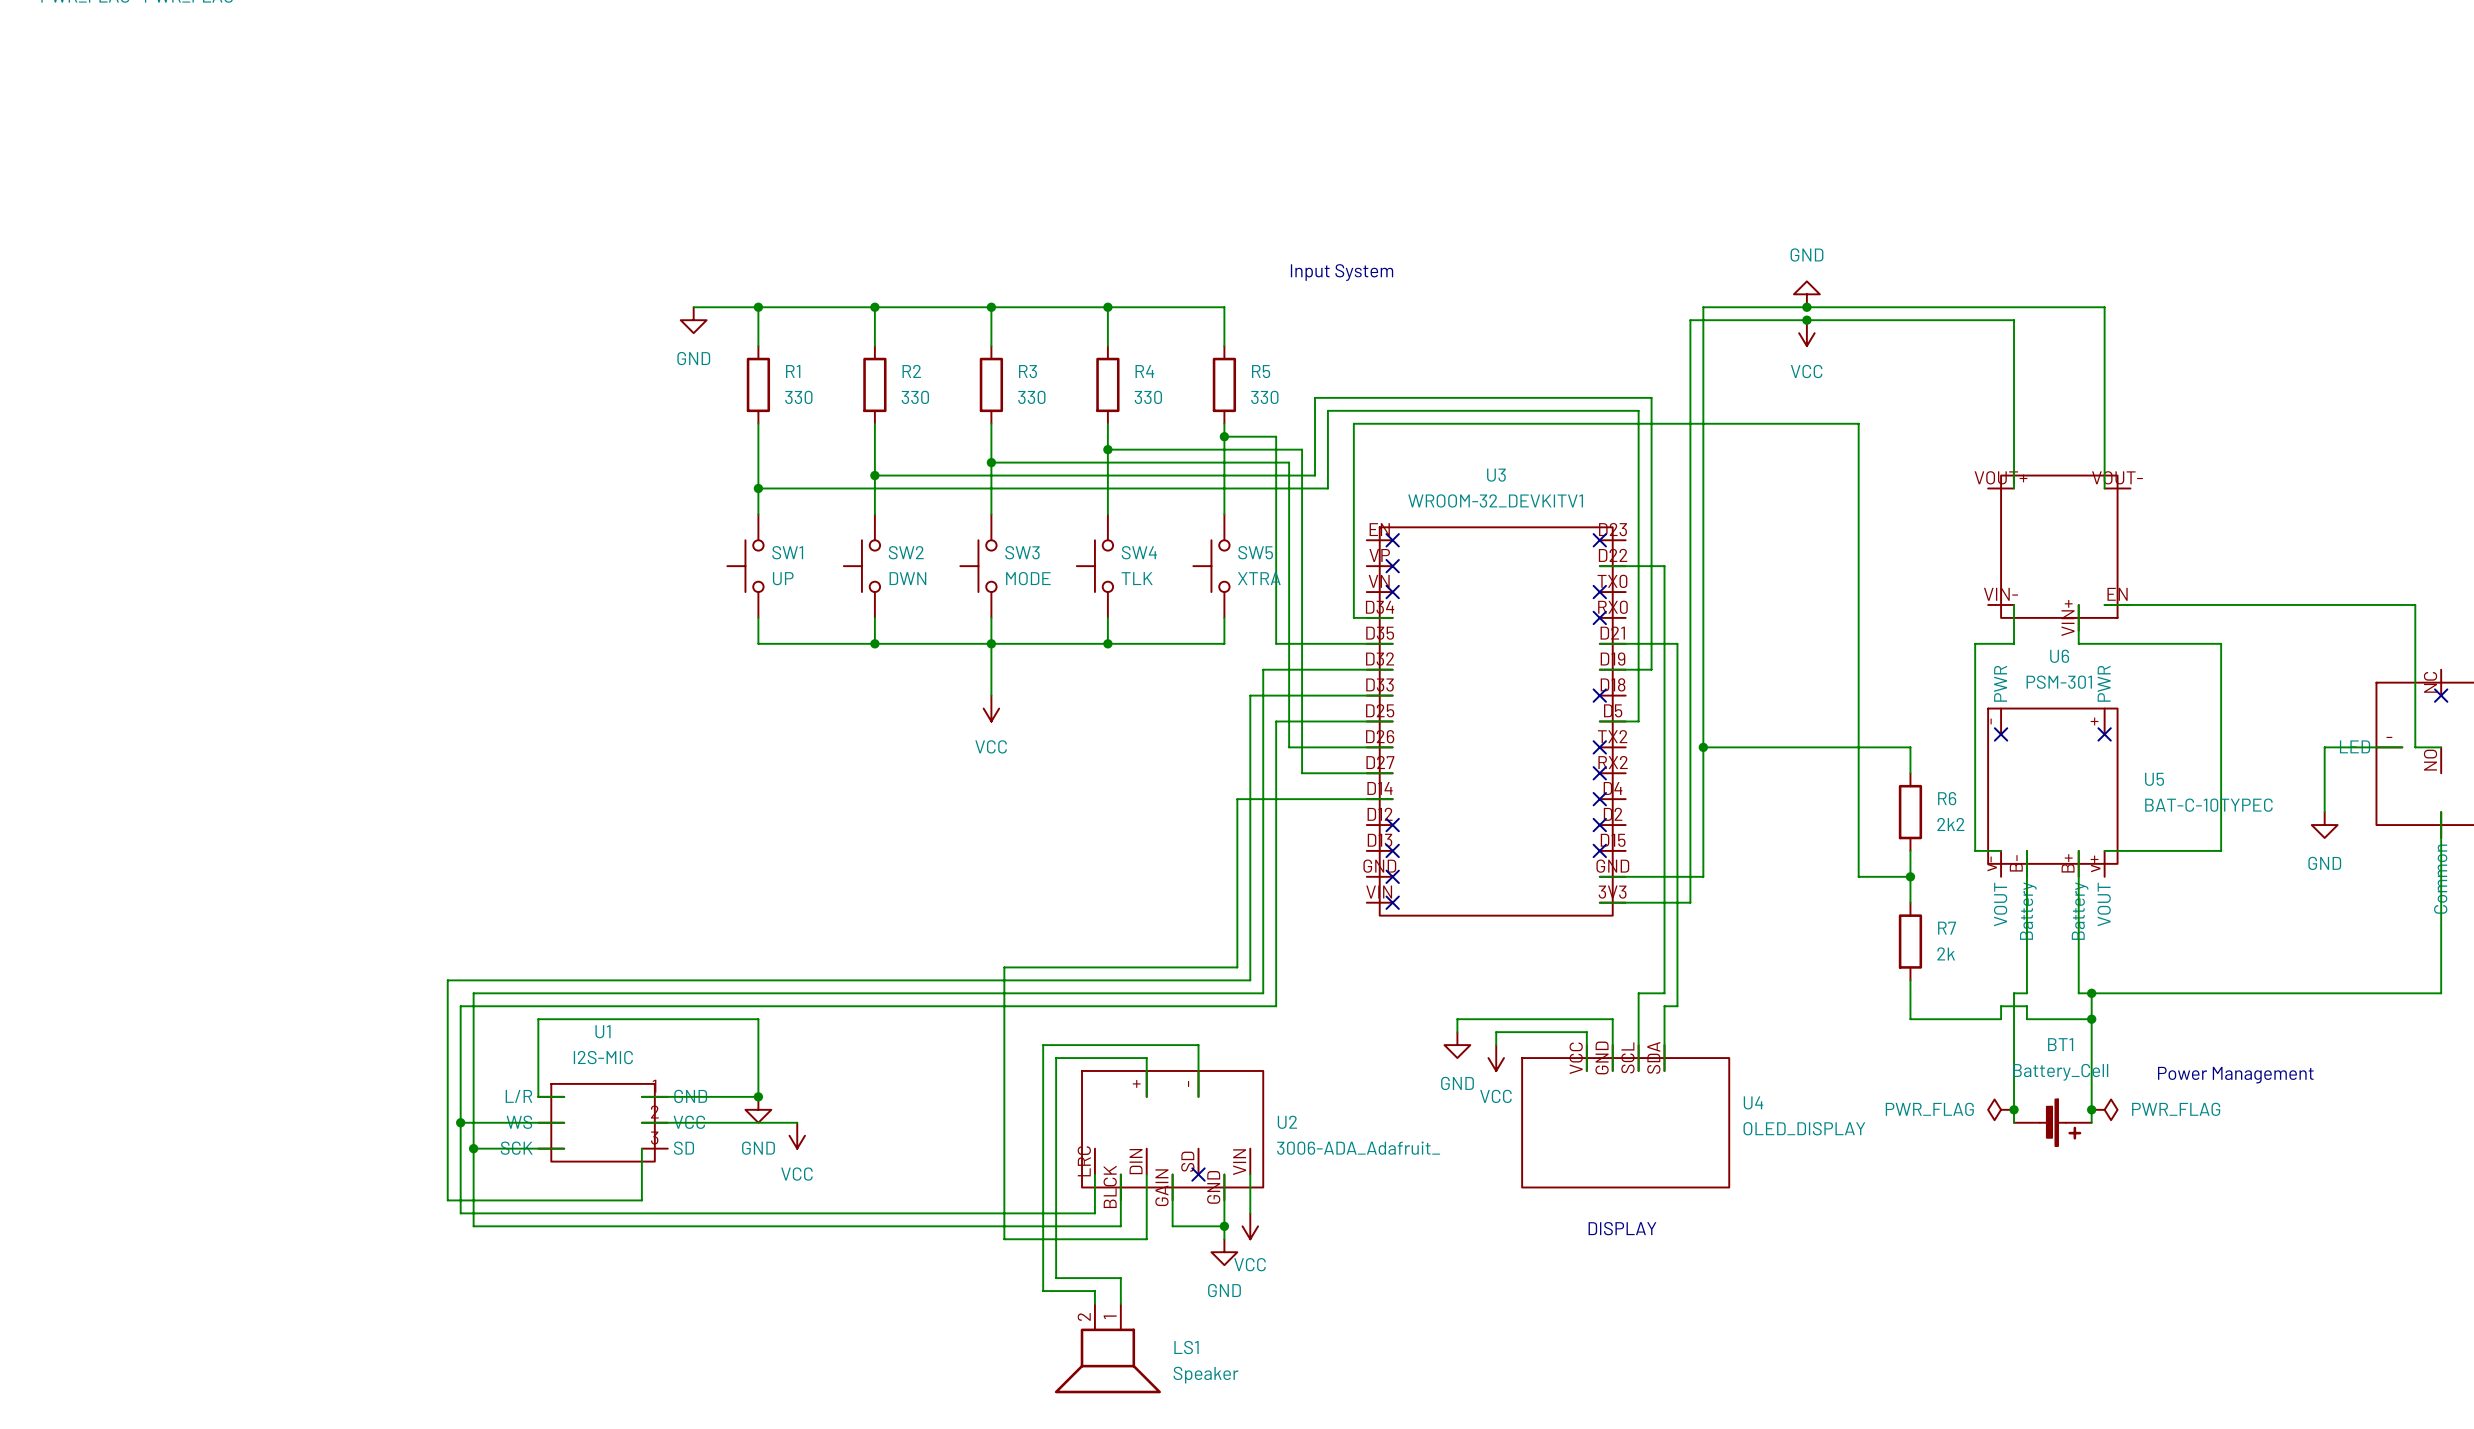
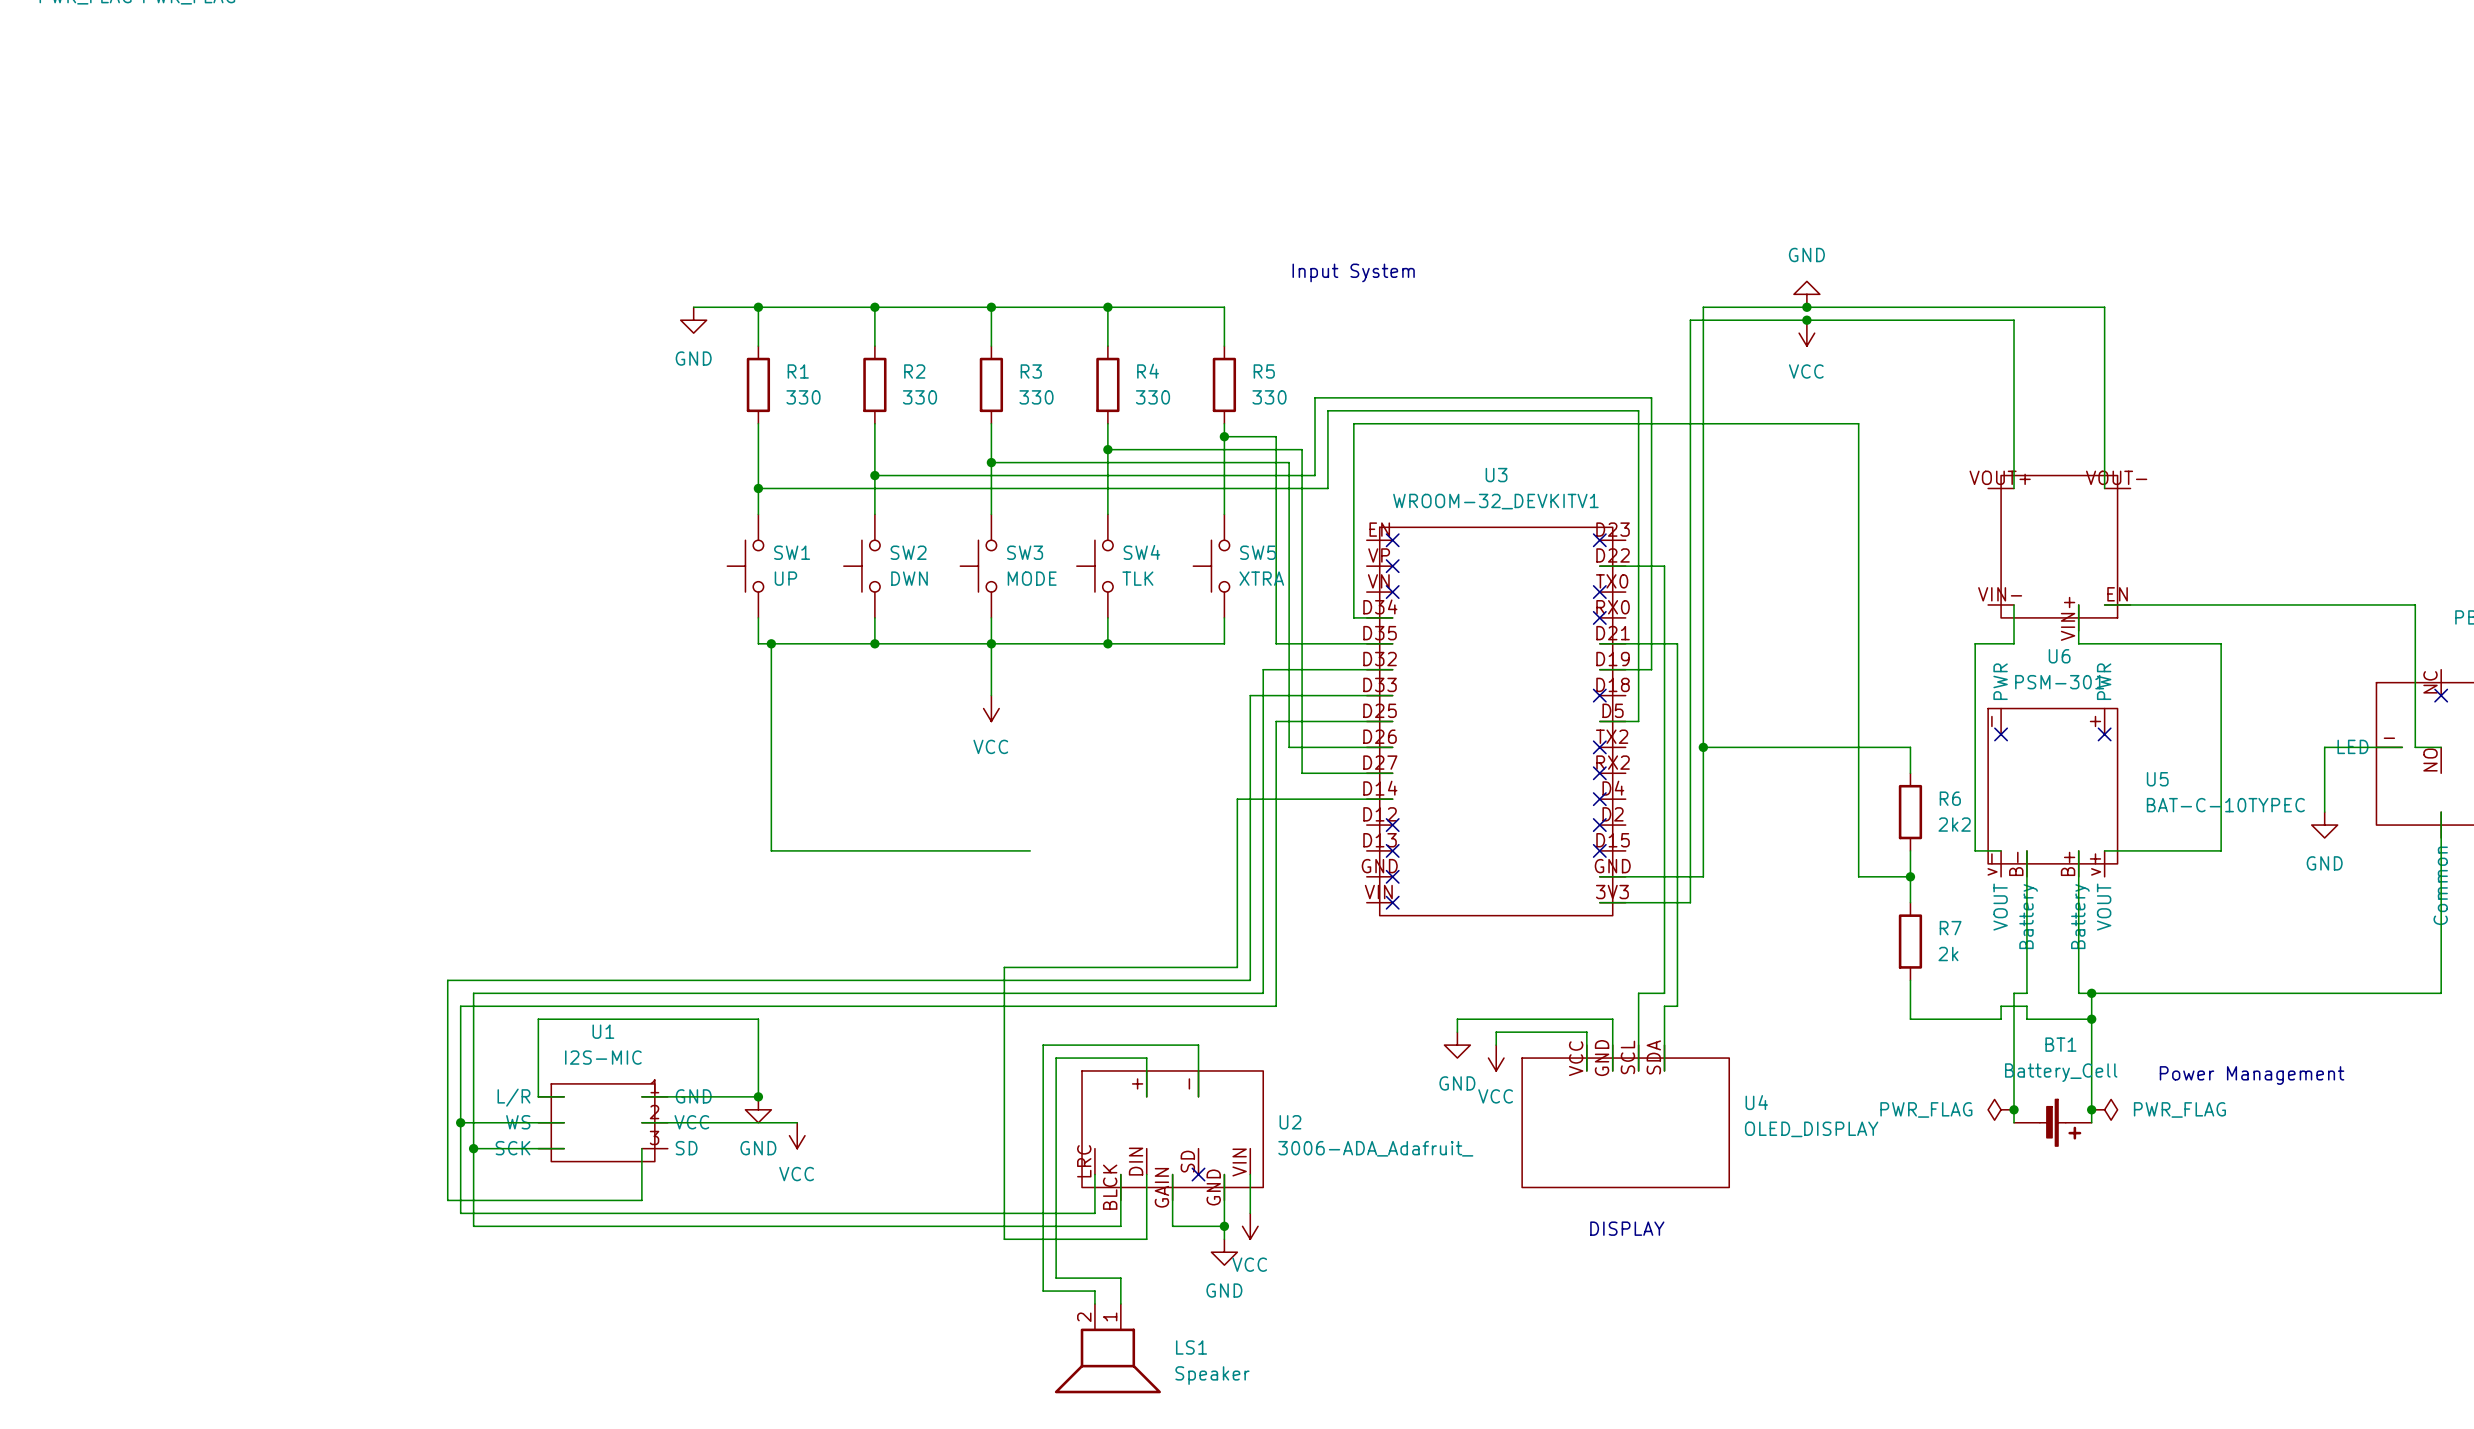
wire: none -> (771, 643) (771, 850) (1030, 850)
junction: none -> (771, 643)

